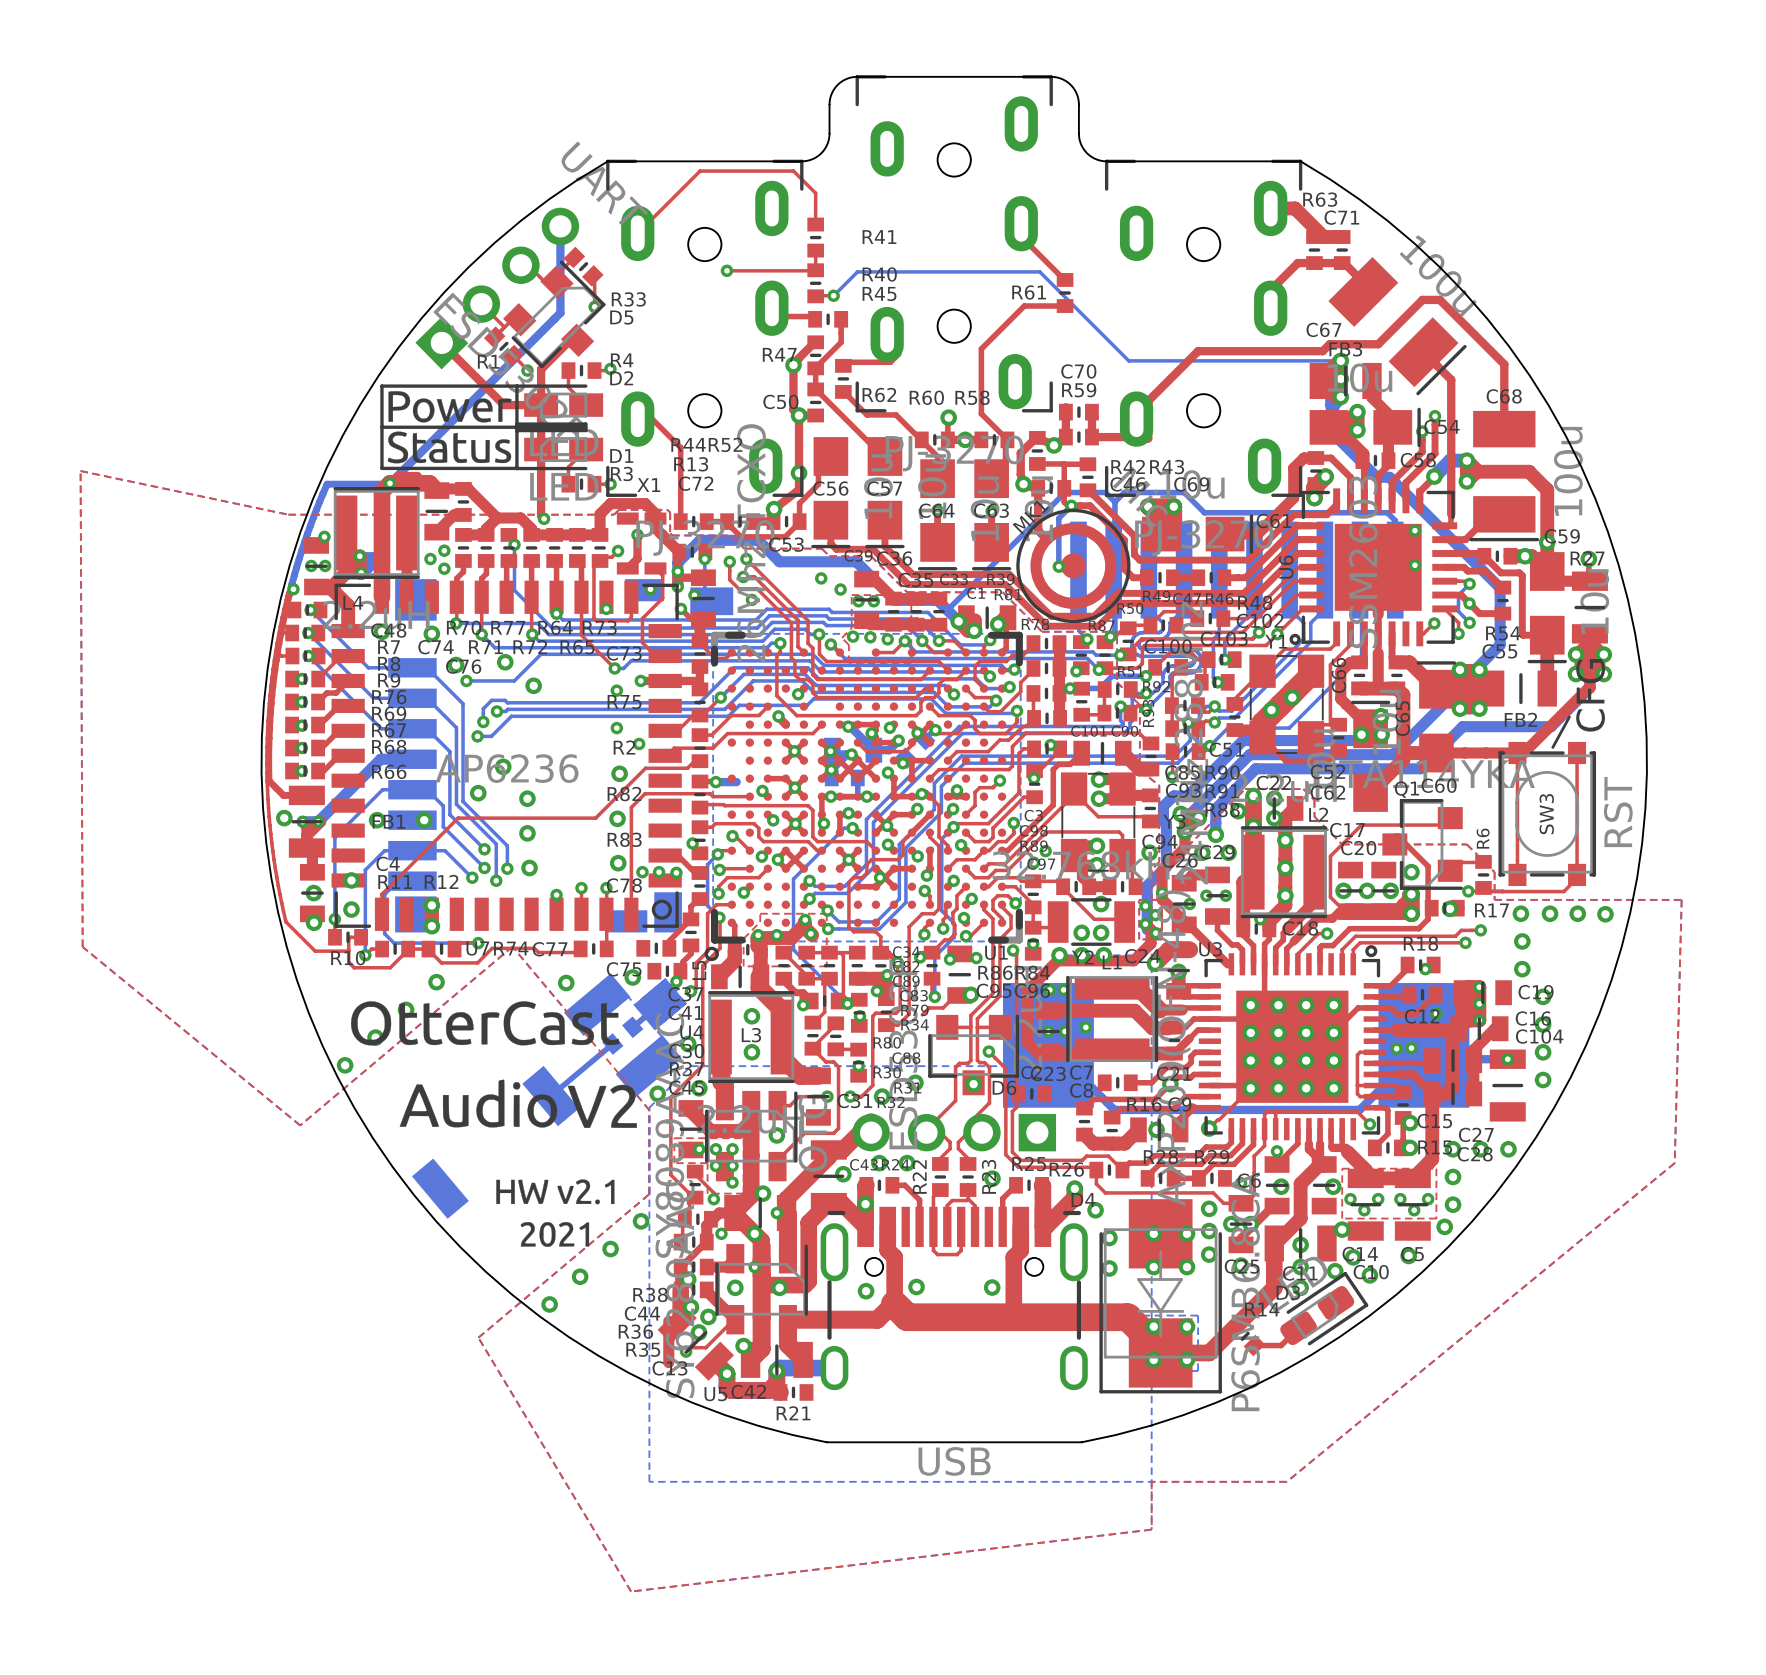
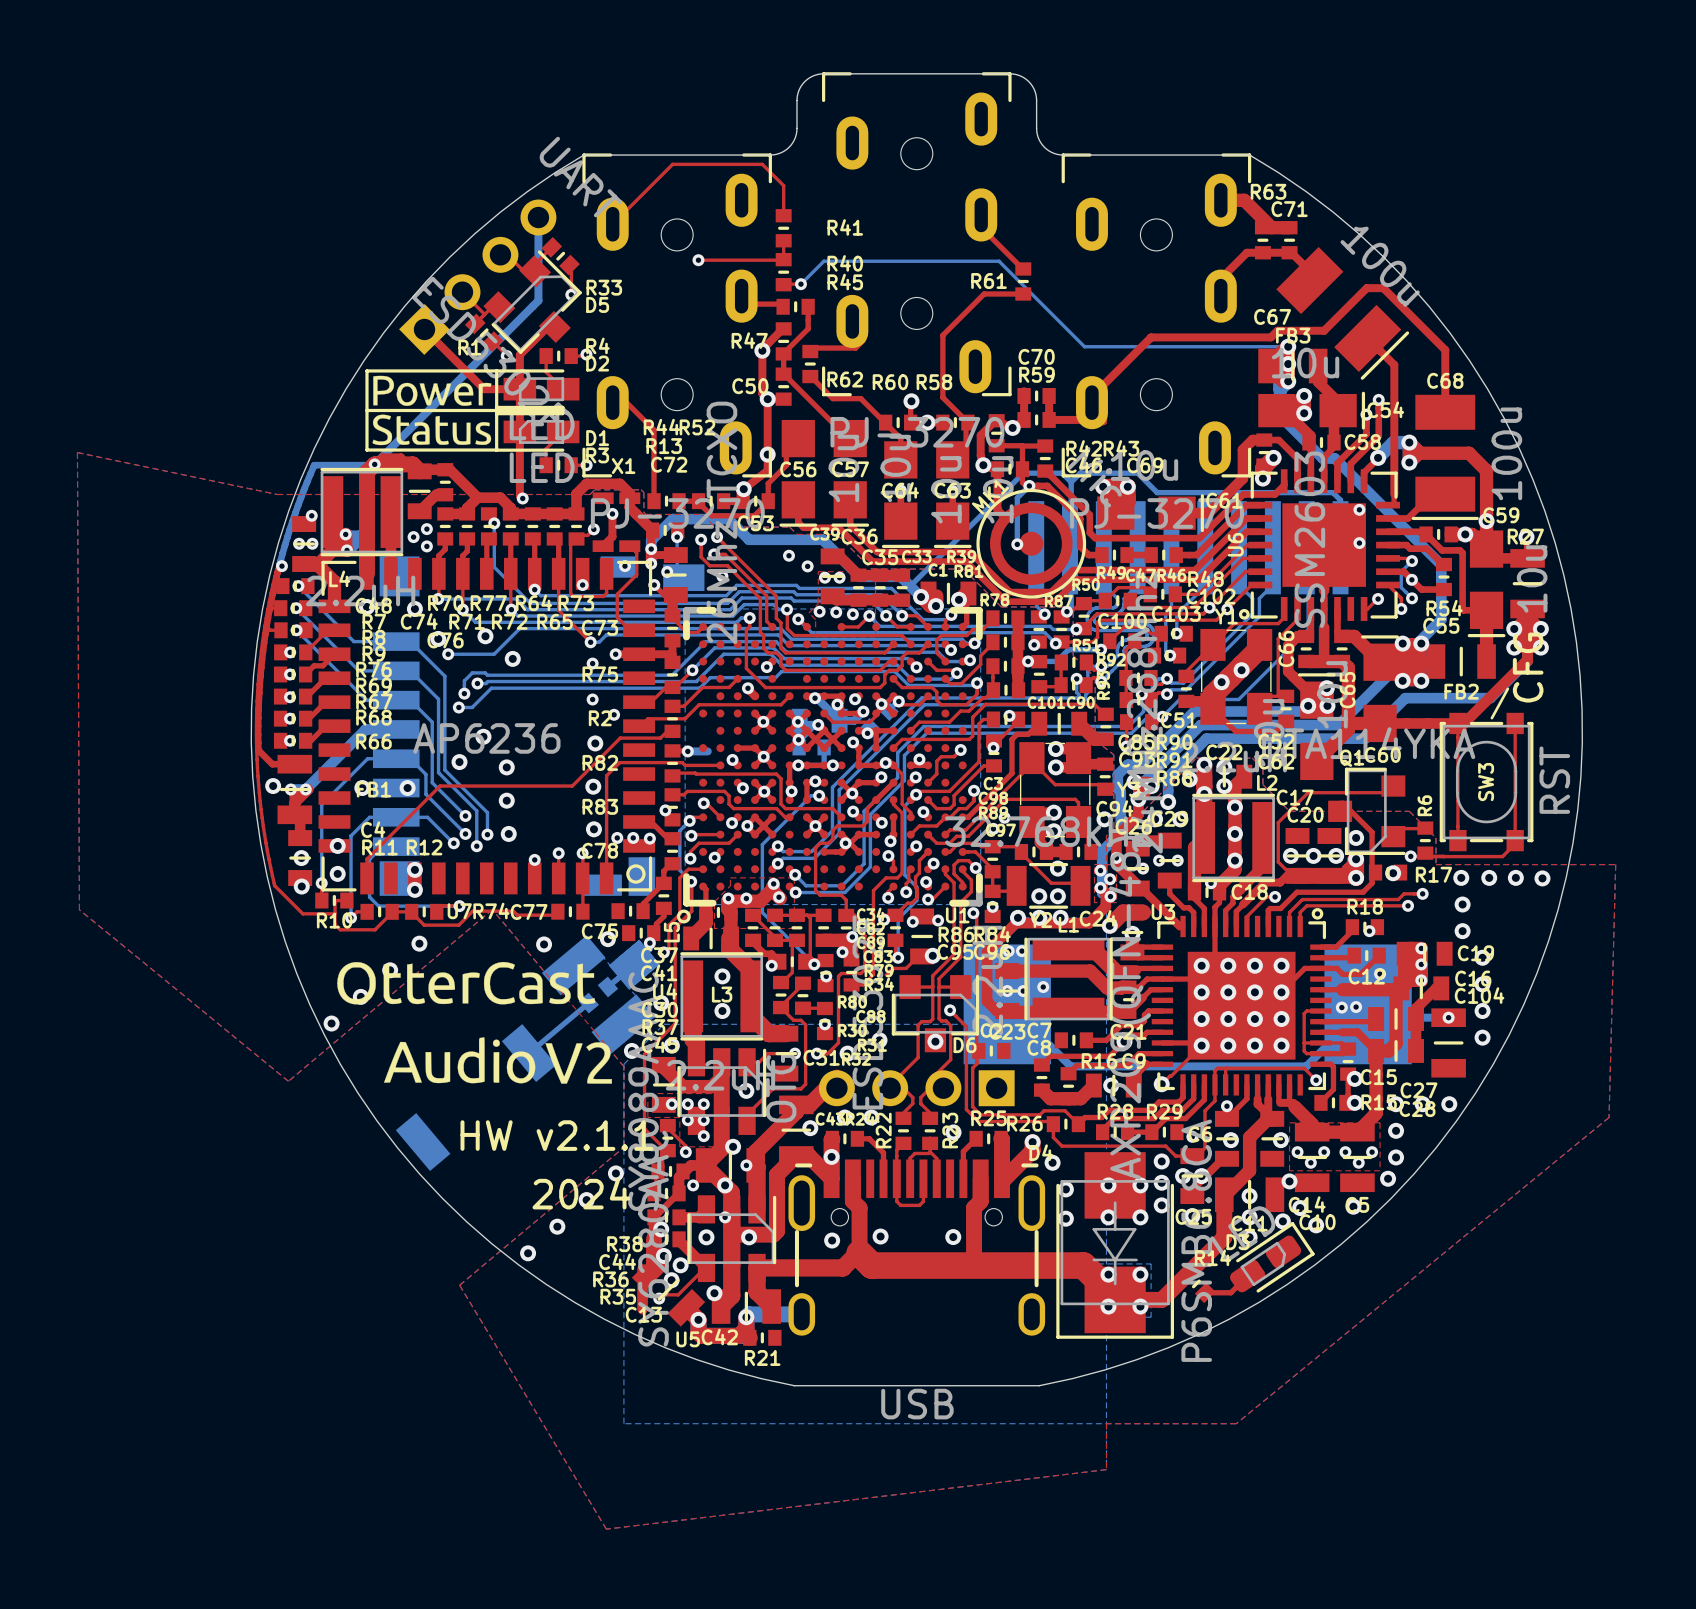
drawing: [496, 1179, 615, 1247] -> none
text: none -> HW v2.1.1 (556, 1135)
text: none -> 2024 (581, 1193)

